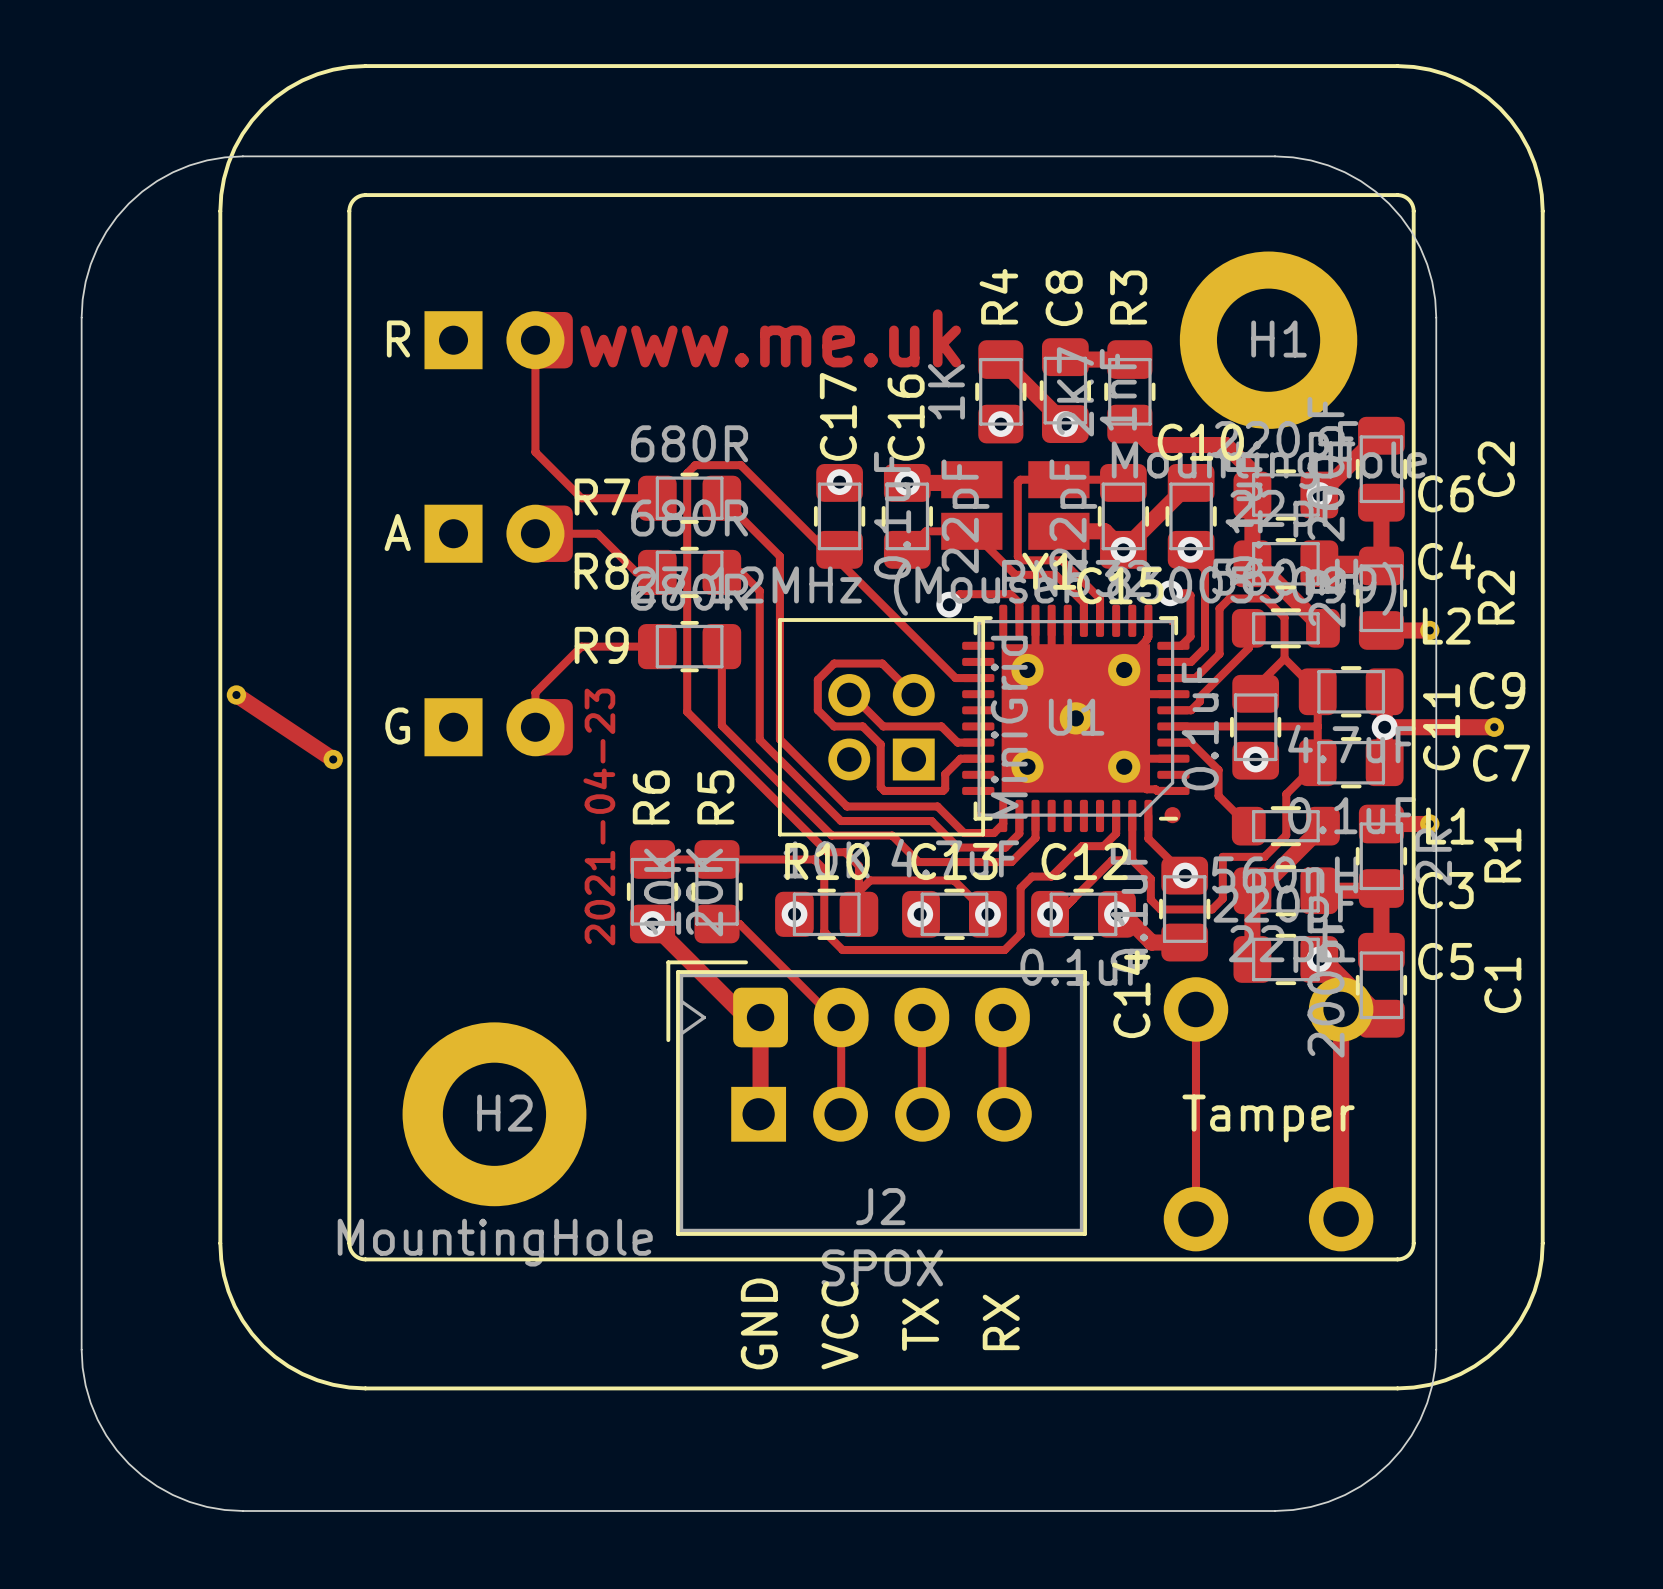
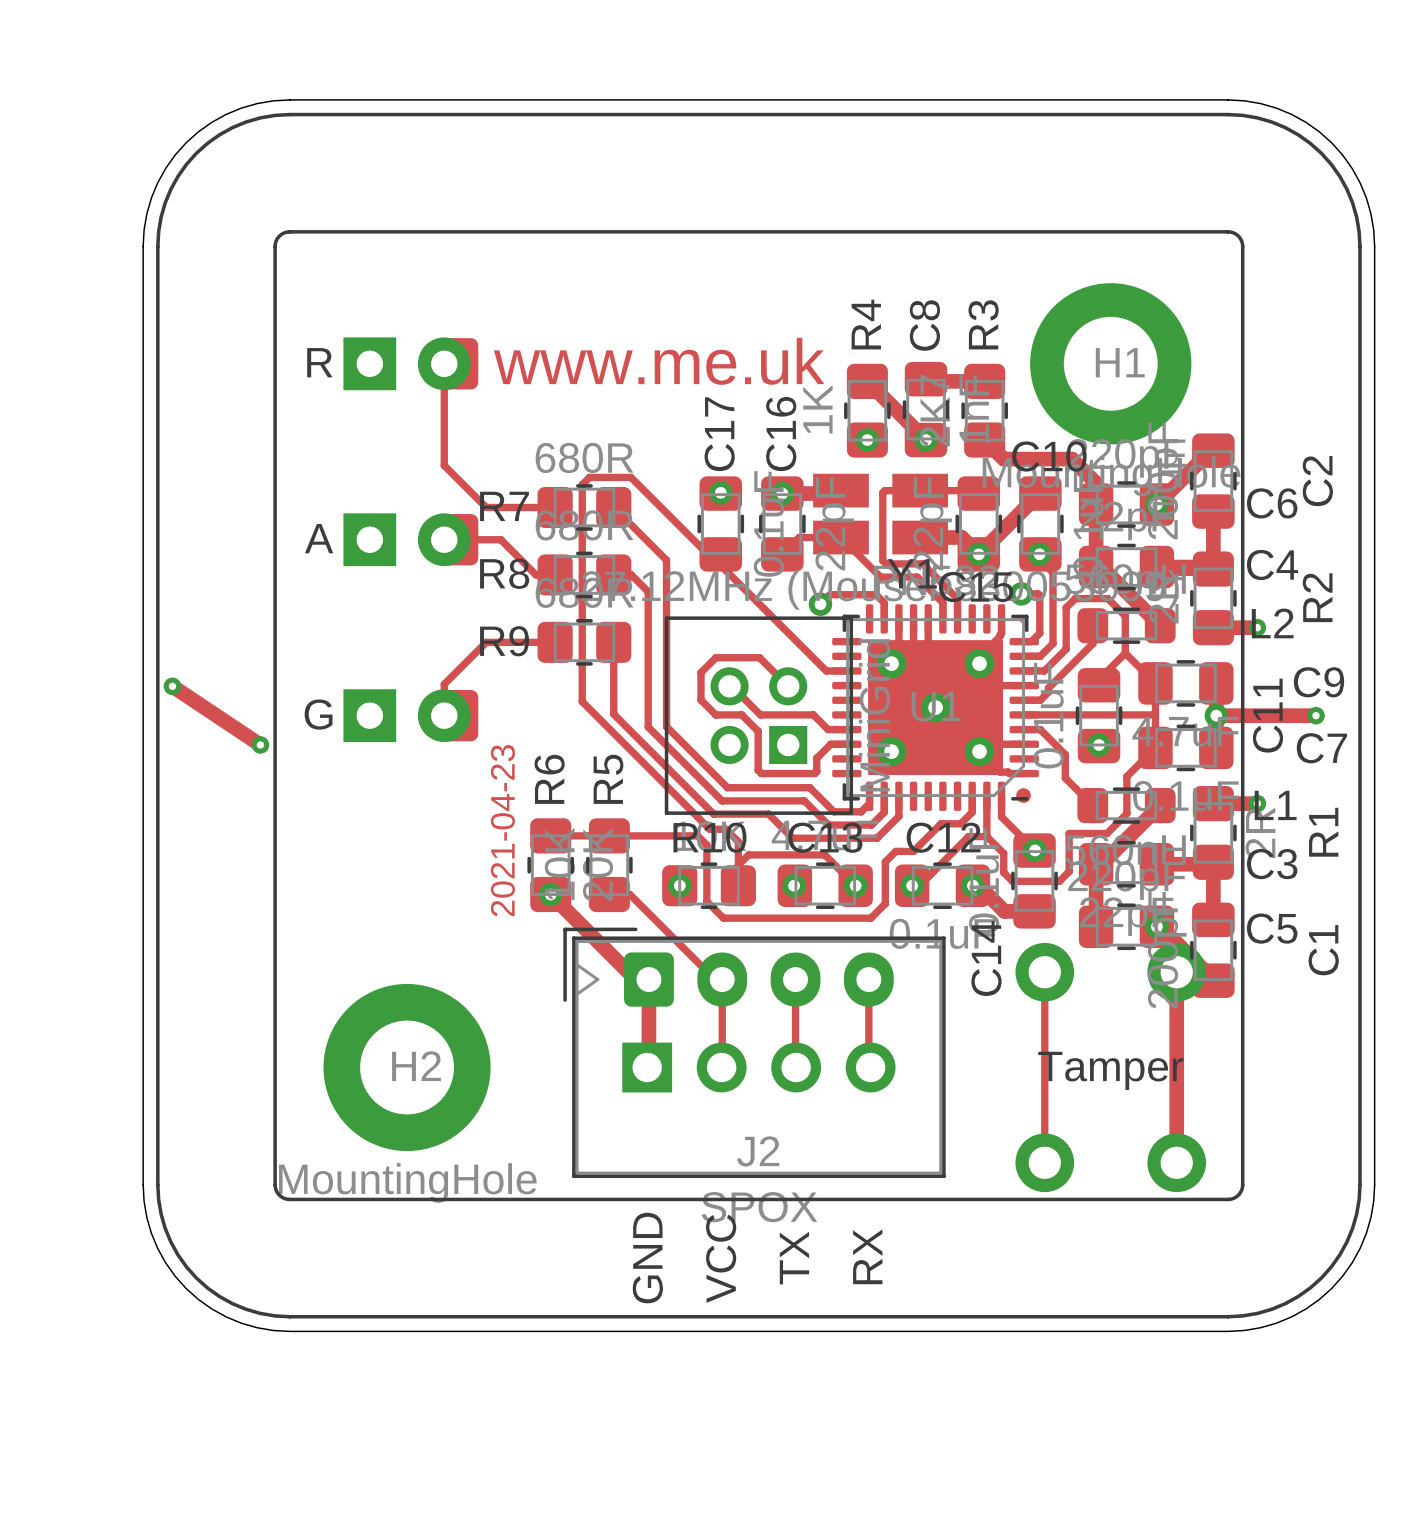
board edge: (242, 156) (1275, 156) (1310, 160) (1344, 172) (1375, 191) (1401, 217) (1411, 231) (1427, 264) (1435, 299) (1436, 317) (1436, 1349) (1432, 1385) (1420, 1419) (1401, 1450) (1375, 1475) (1360, 1486) (1328, 1501) (1293, 1509) (1275, 1511) (242, 1511) (207, 1506) (172, 1495) (142, 1475) (116, 1450) (106, 1435) (90, 1402) (82, 1367) (81, 1349) (82, 299) (90, 264) (106, 231) (116, 217) (142, 191) (157, 181) (189, 165) (224, 157) (242, 156) -> (289, 99) (1228, 99) (1260, 103) (1291, 114) (1319, 131) (1342, 155) (1352, 168) (1366, 198) (1373, 230) (1374, 246) (1374, 1184) (1370, 1217) (1360, 1248) (1342, 1276) (1319, 1299) (1306, 1308) (1276, 1323) (1244, 1330) (1228, 1331) (289, 1331) (257, 1327) (226, 1316) (198, 1299) (175, 1276) (165, 1262) (151, 1233) (144, 1201) (143, 1184) (144, 230) (151, 198) (157, 182) (165, 168) (186, 142) (198, 131) (226, 114) (257, 103) (289, 99)

